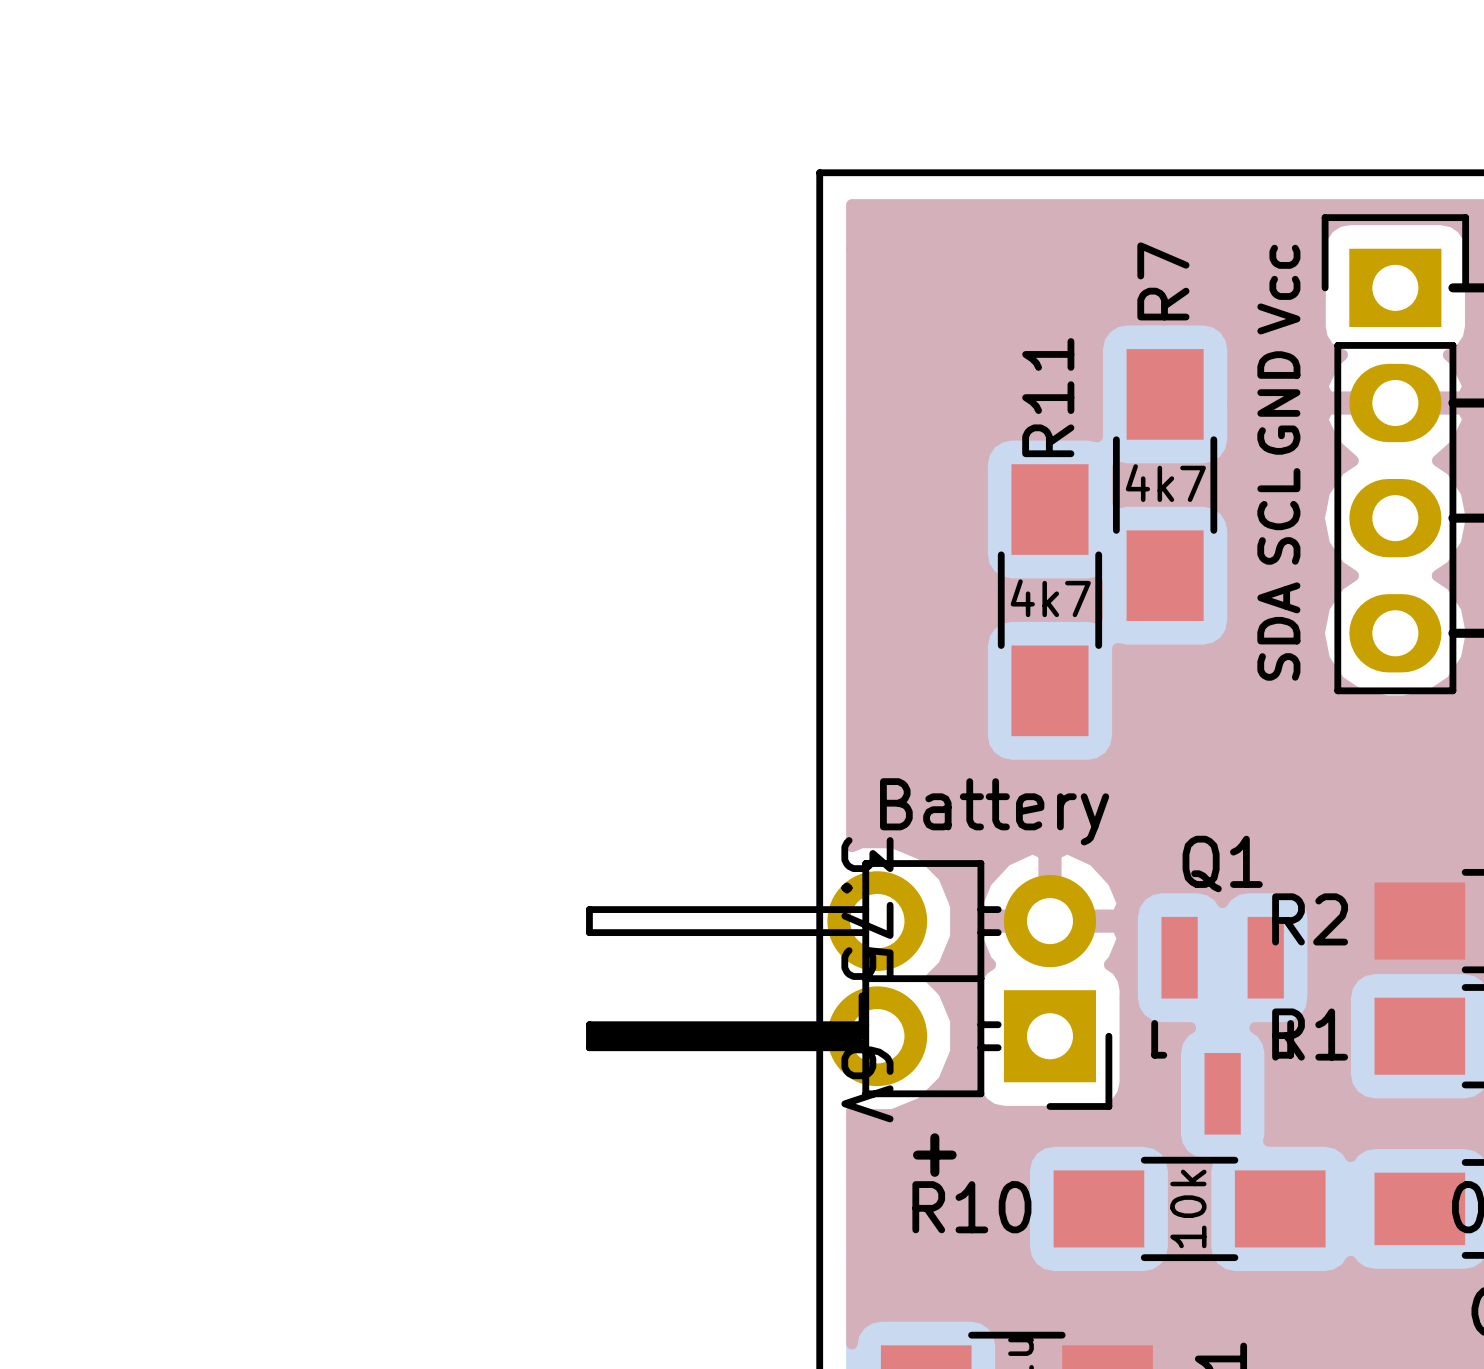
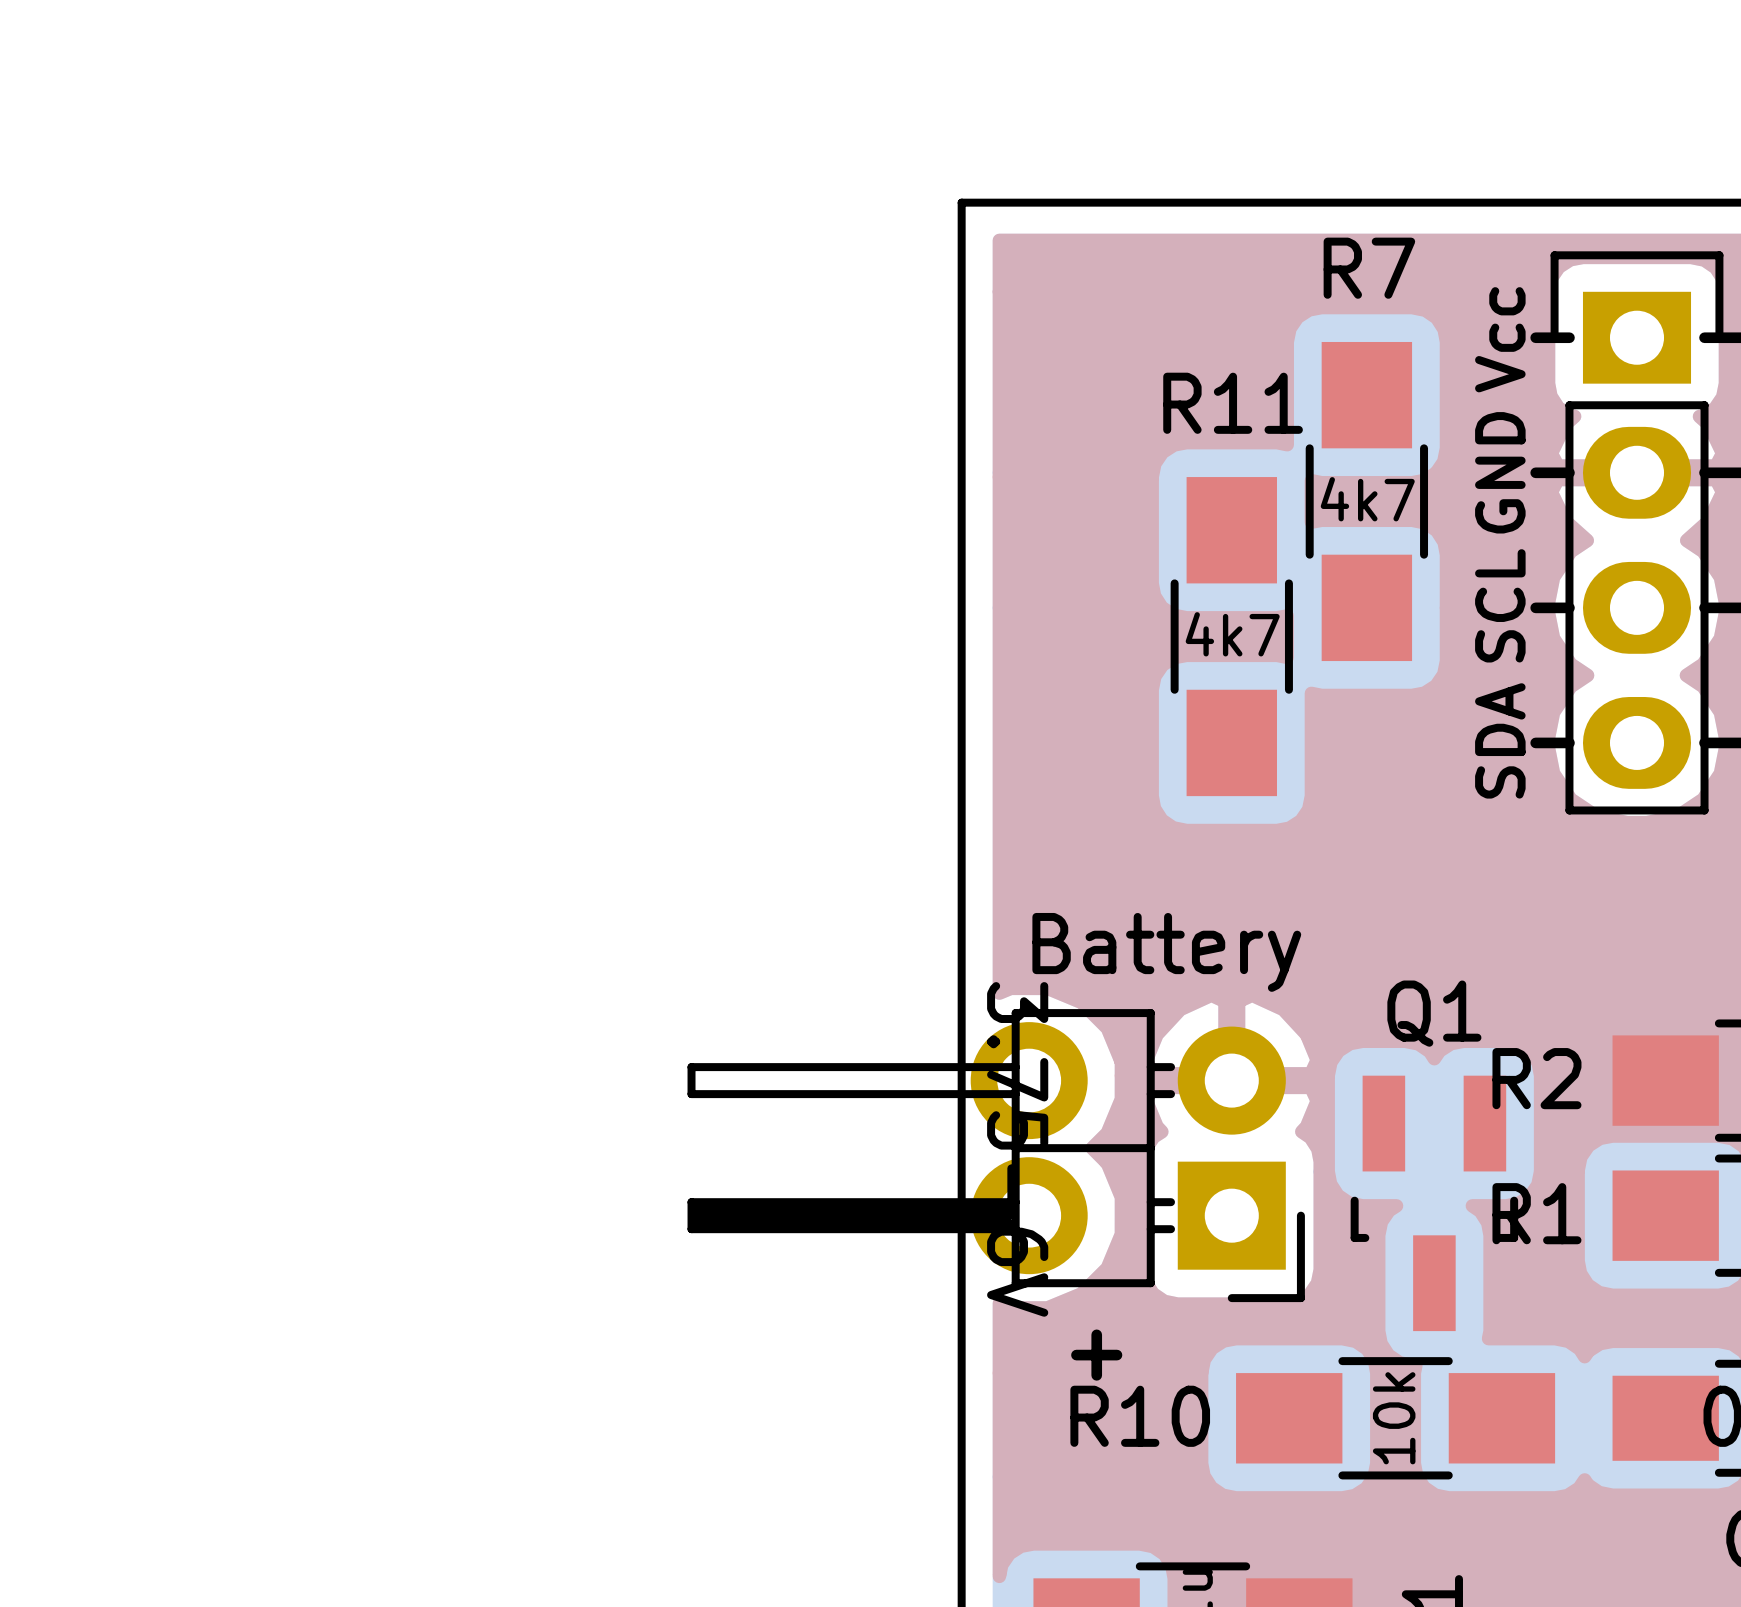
R7 name rotation: 0° (1163, 281) -> 90° clockwise (1369, 268)
line: none -> (1535, 337) (1569, 337)
R11 name rotation: 0° (1048, 397) -> 90° clockwise (1233, 403)
line: none -> (1535, 472) (1569, 472)
R7 position: (1165, 485) -> (1366, 501)
line: none -> (1535, 607) (1569, 607)
R11 position: (1049, 600) -> (1231, 636)
line: none -> (1535, 742) (1569, 742)

